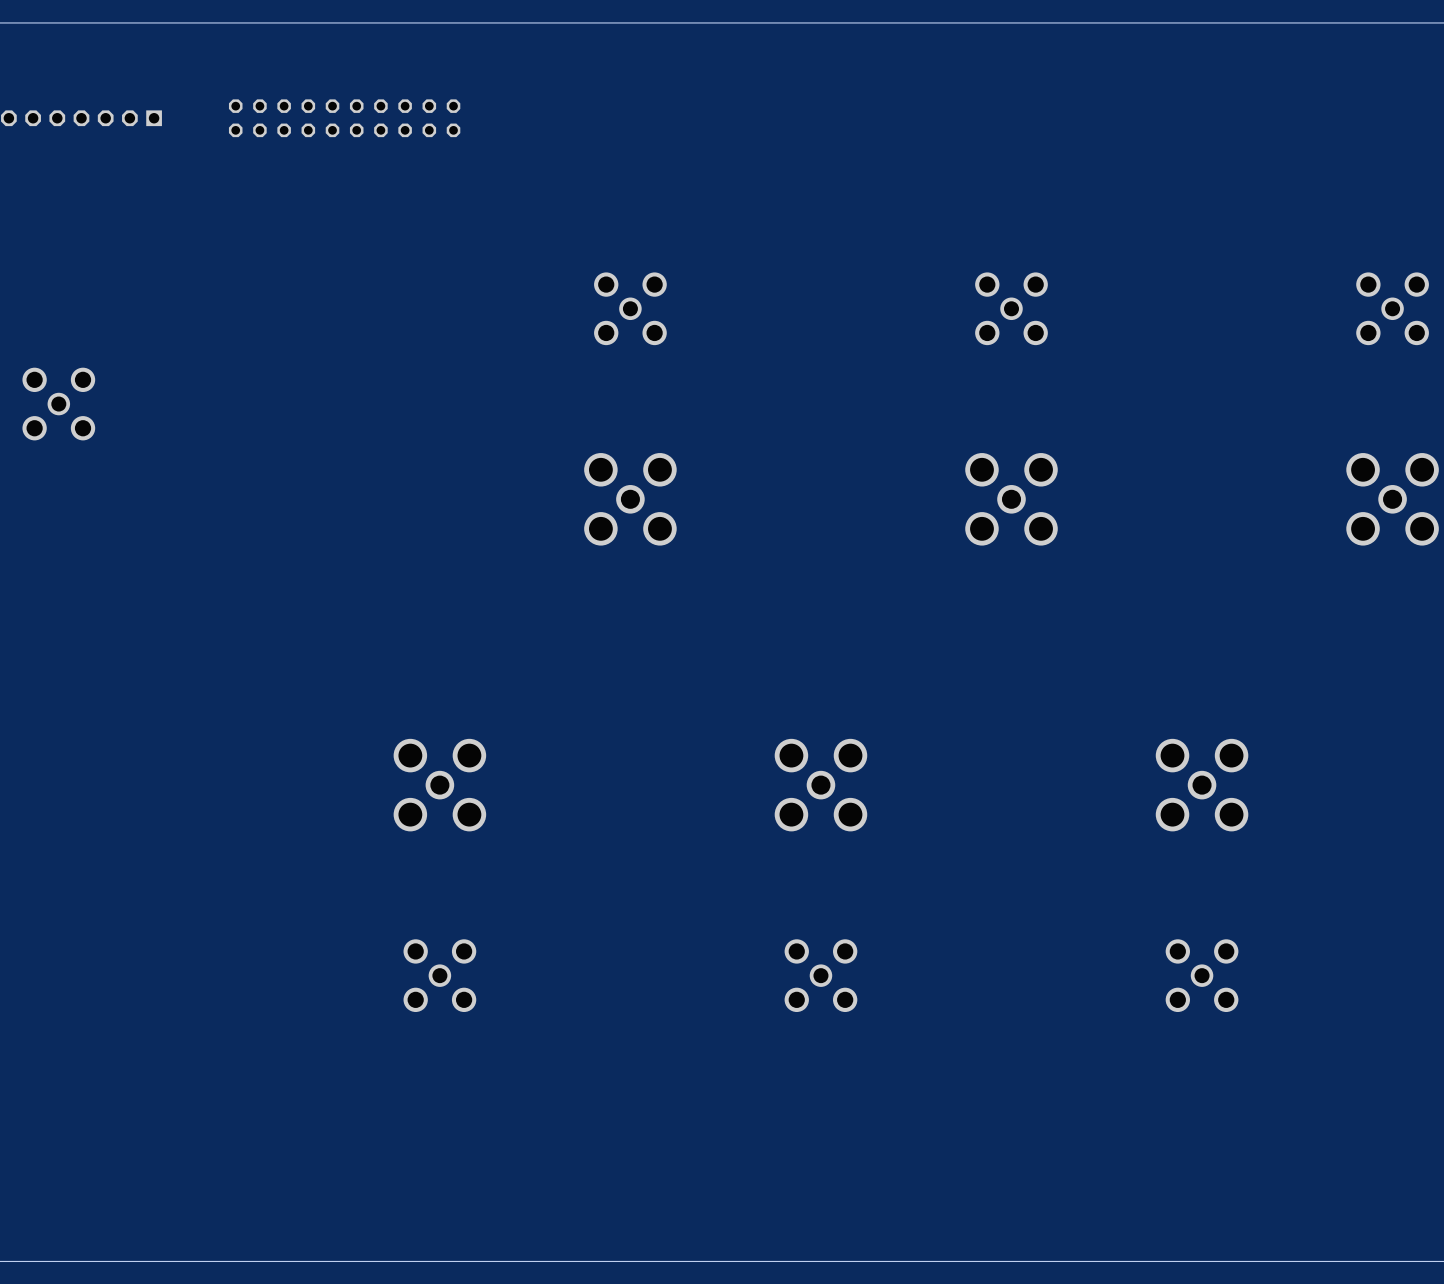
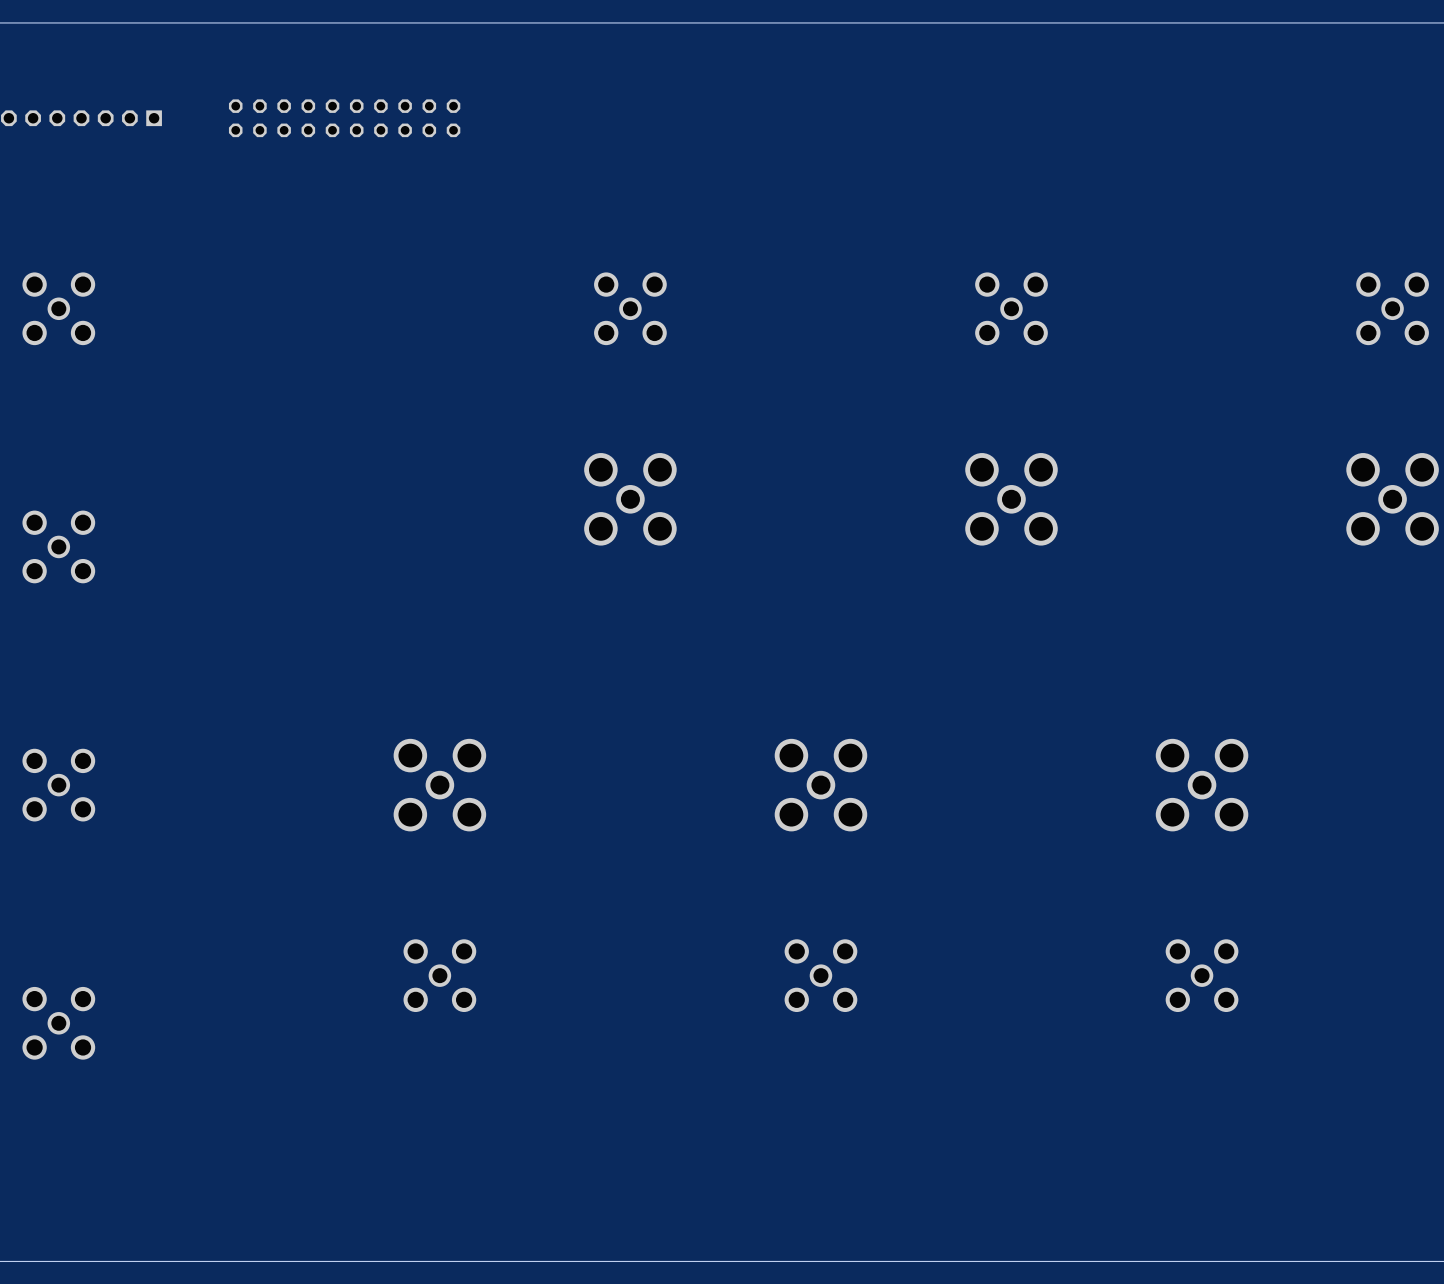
part: none -> (58, 308)
part: (58, 404) -> none
part: none -> (58, 546)
part: none -> (58, 785)
part: none -> (58, 1023)

